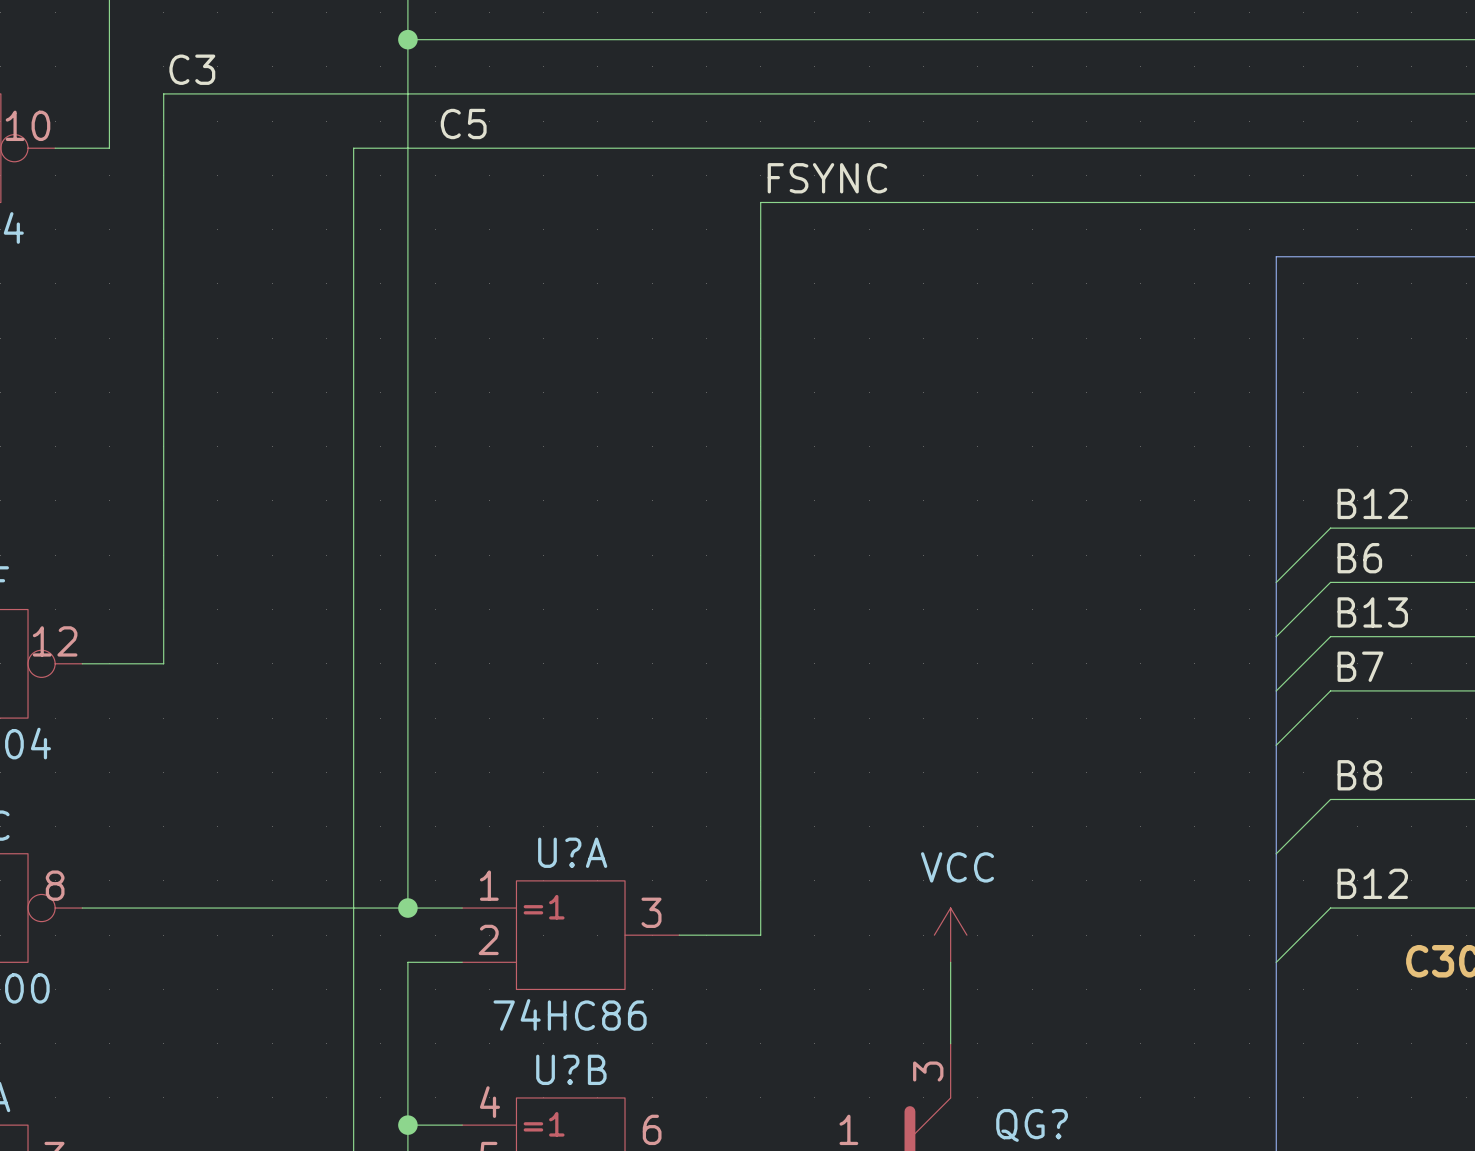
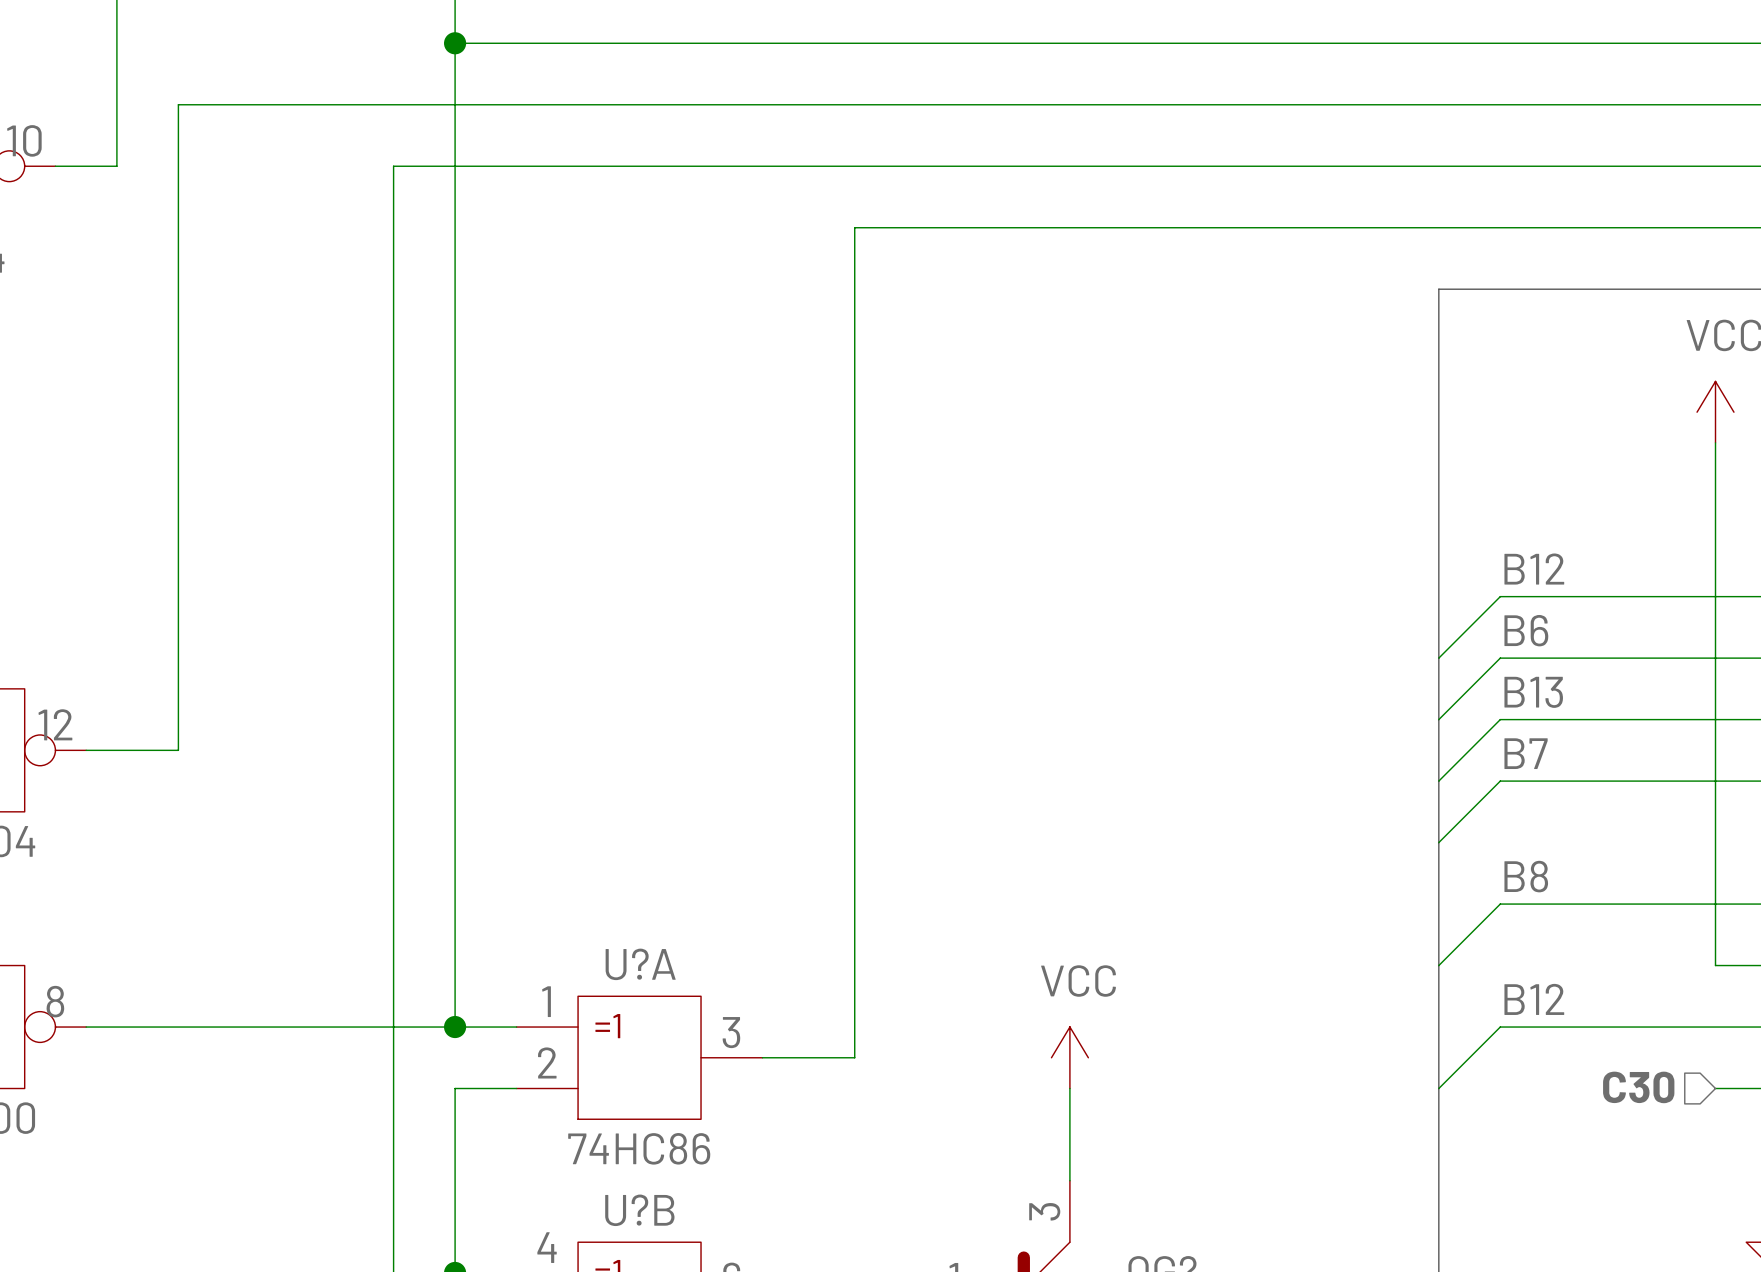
label: C3 (192, 69) -> none
label: C5 (463, 123) -> none
label: FSYNC (827, 178) -> none

